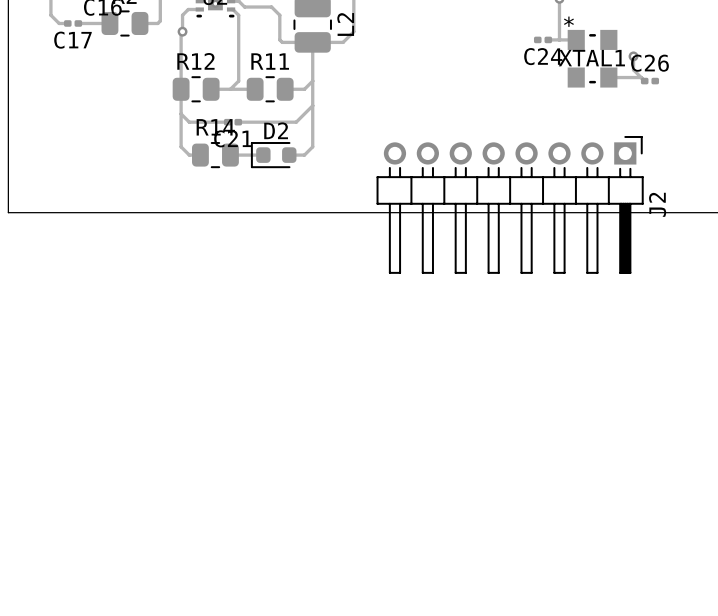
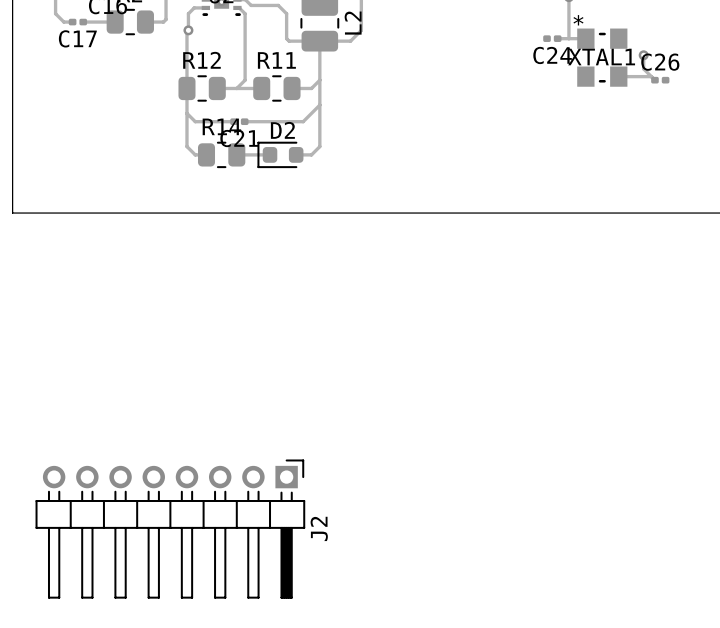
J2 position: (510, 204) -> (170, 529)

